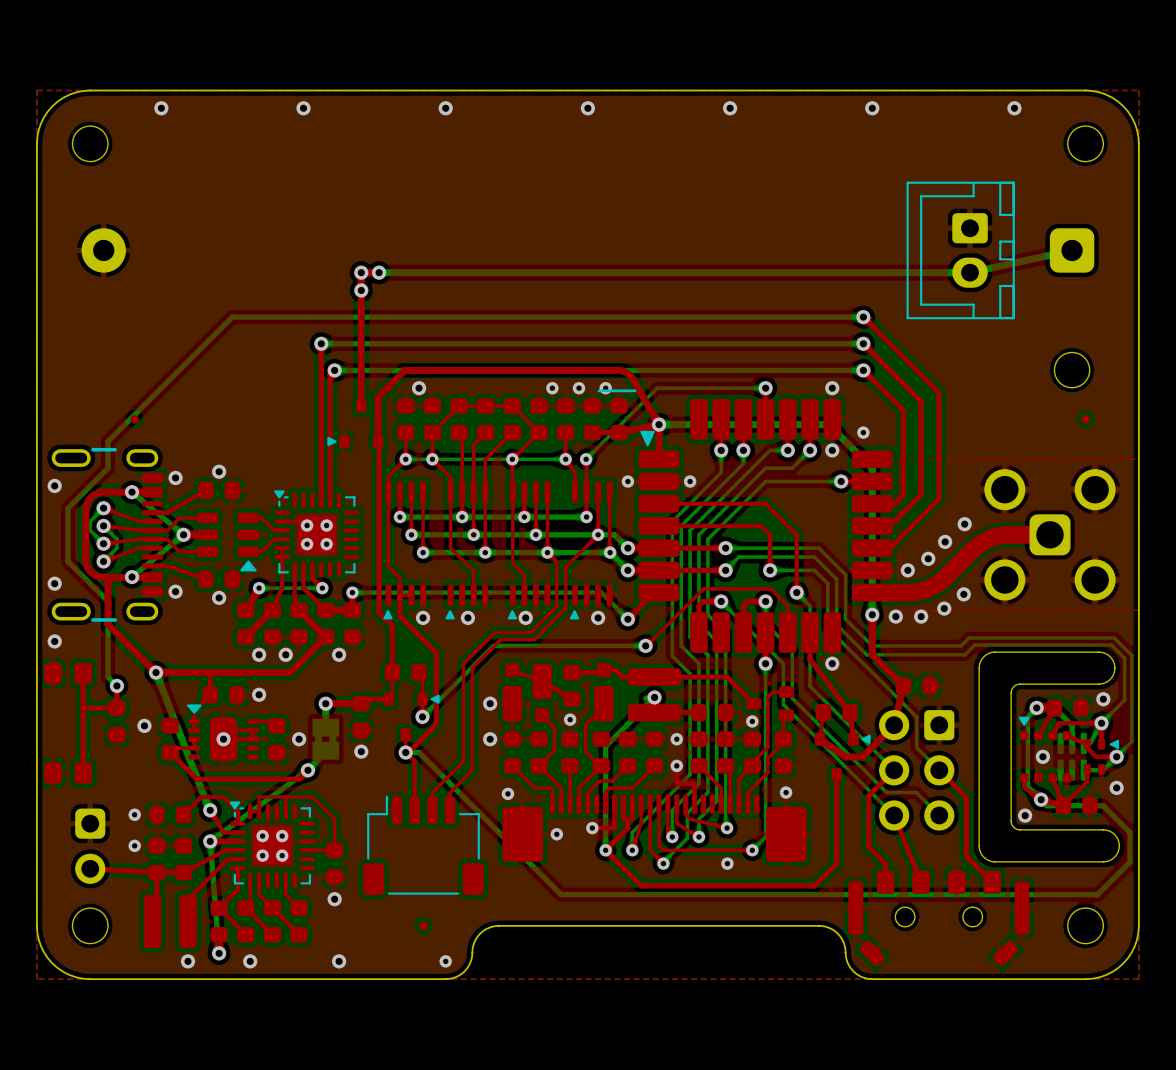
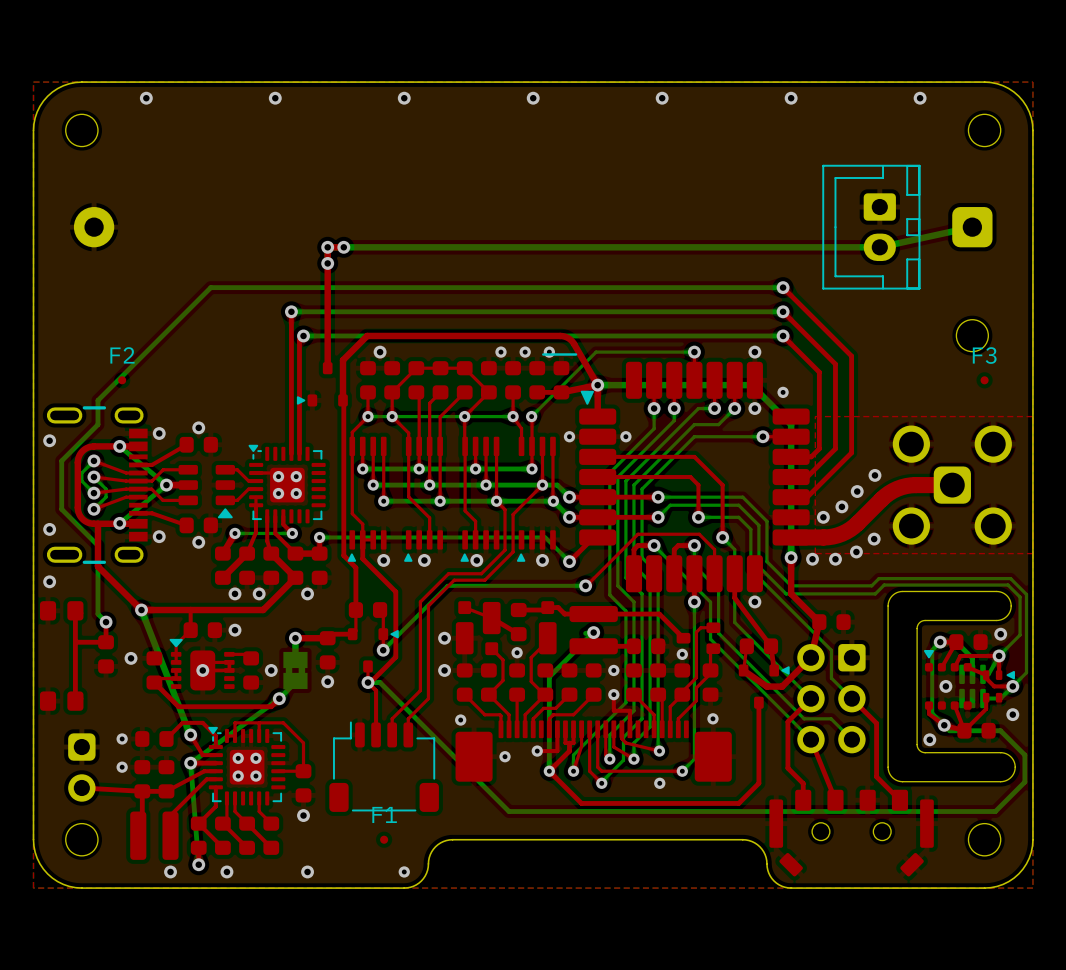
F2 name: none -> F2 (122, 355)
F3 name: none -> F3 (984, 355)
F1 name: none -> F1 (384, 814)

